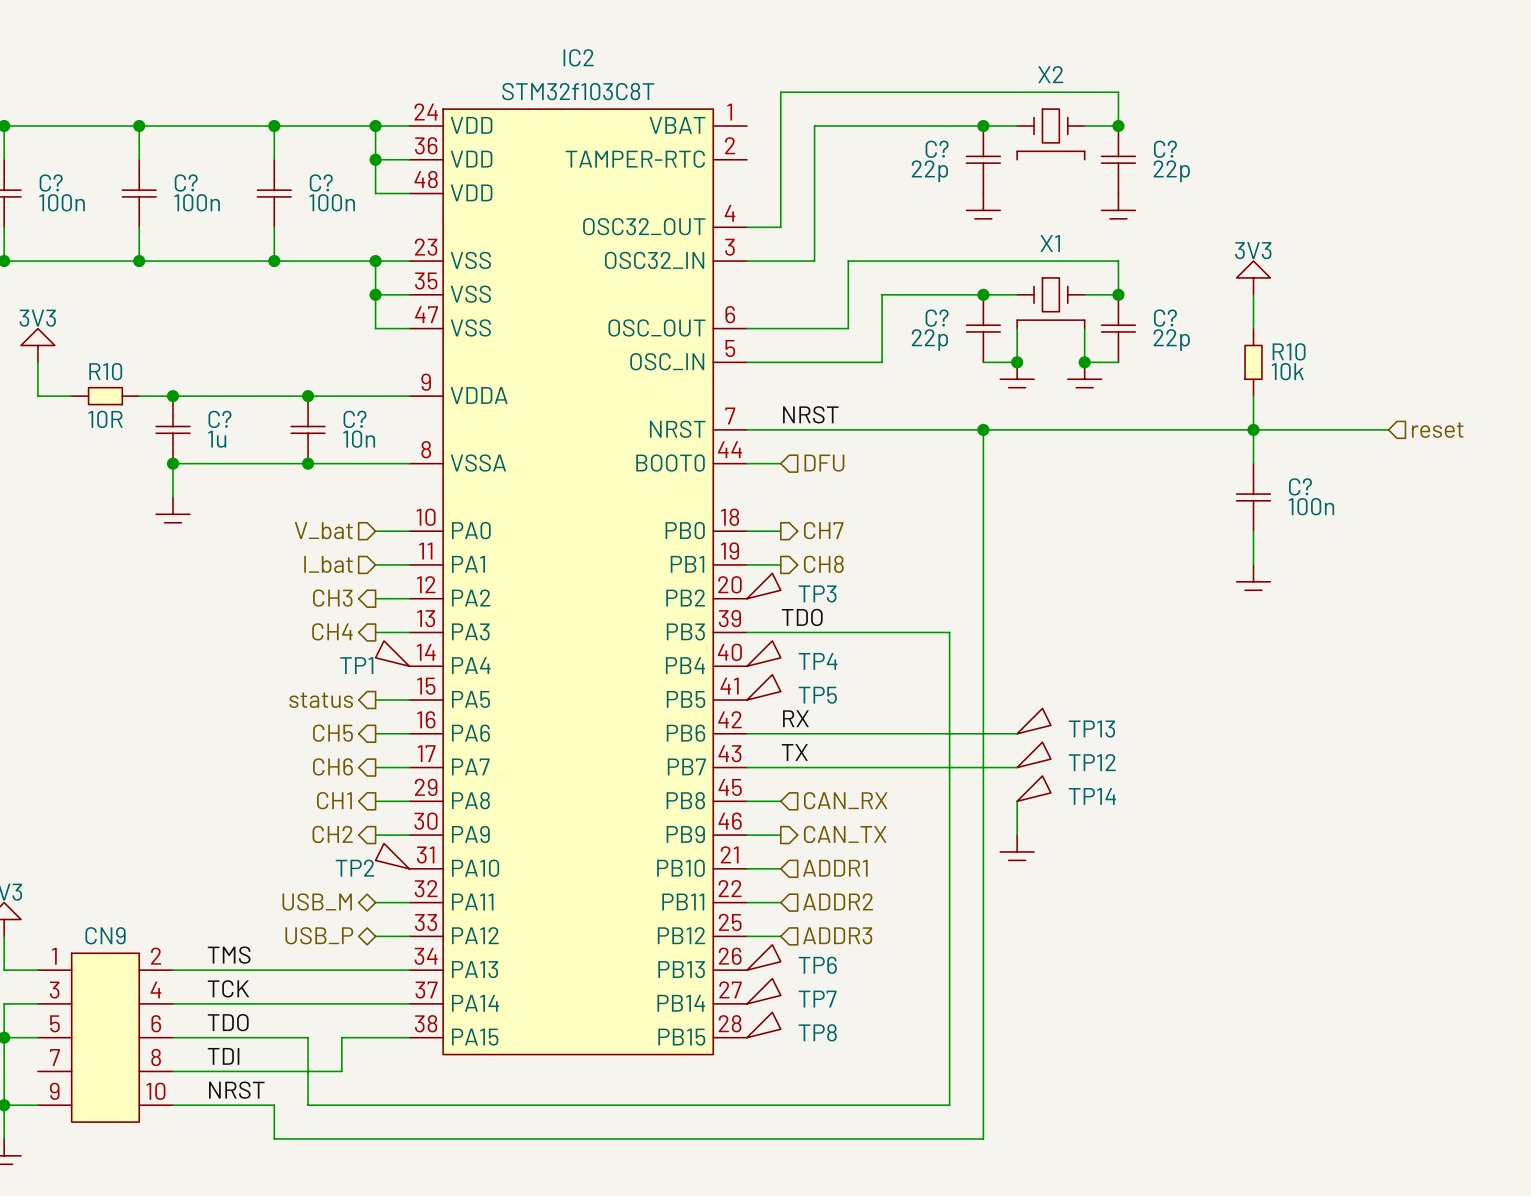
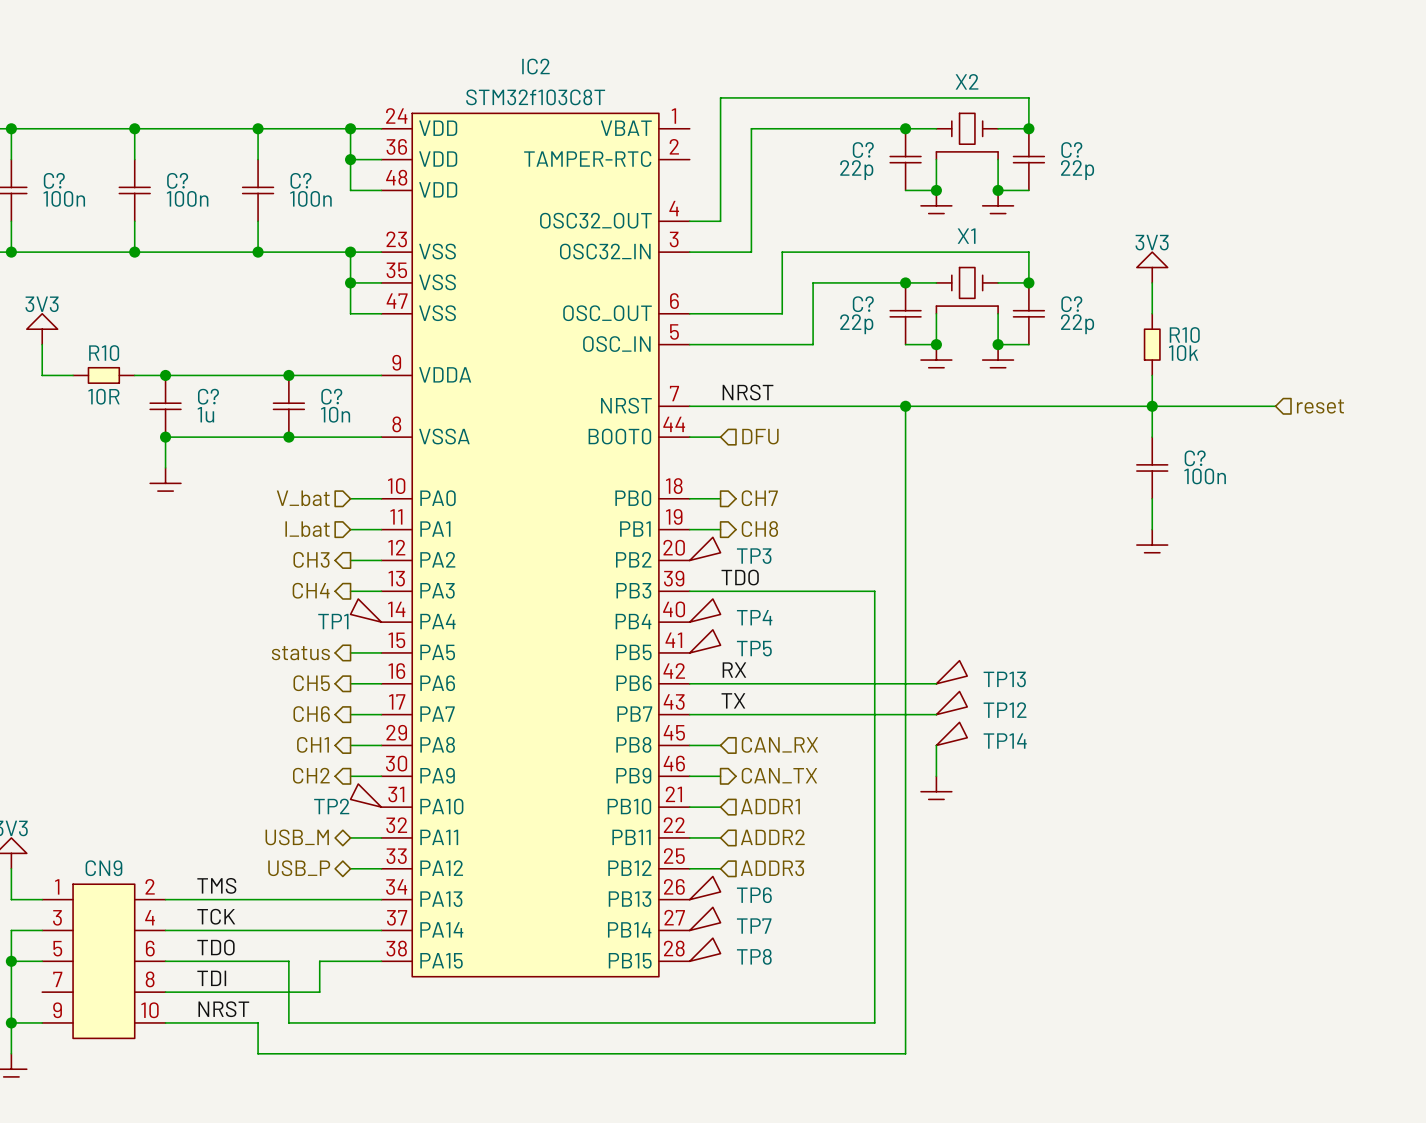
wire: none -> (936, 159) (936, 190) (905, 190)
wire: none -> (998, 159) (998, 190) (1028, 190)
junction: none -> (936, 190)
junction: none -> (998, 190)
power symbol position: (983, 210) -> (936, 205)
power symbol position: (1118, 210) -> (998, 205)

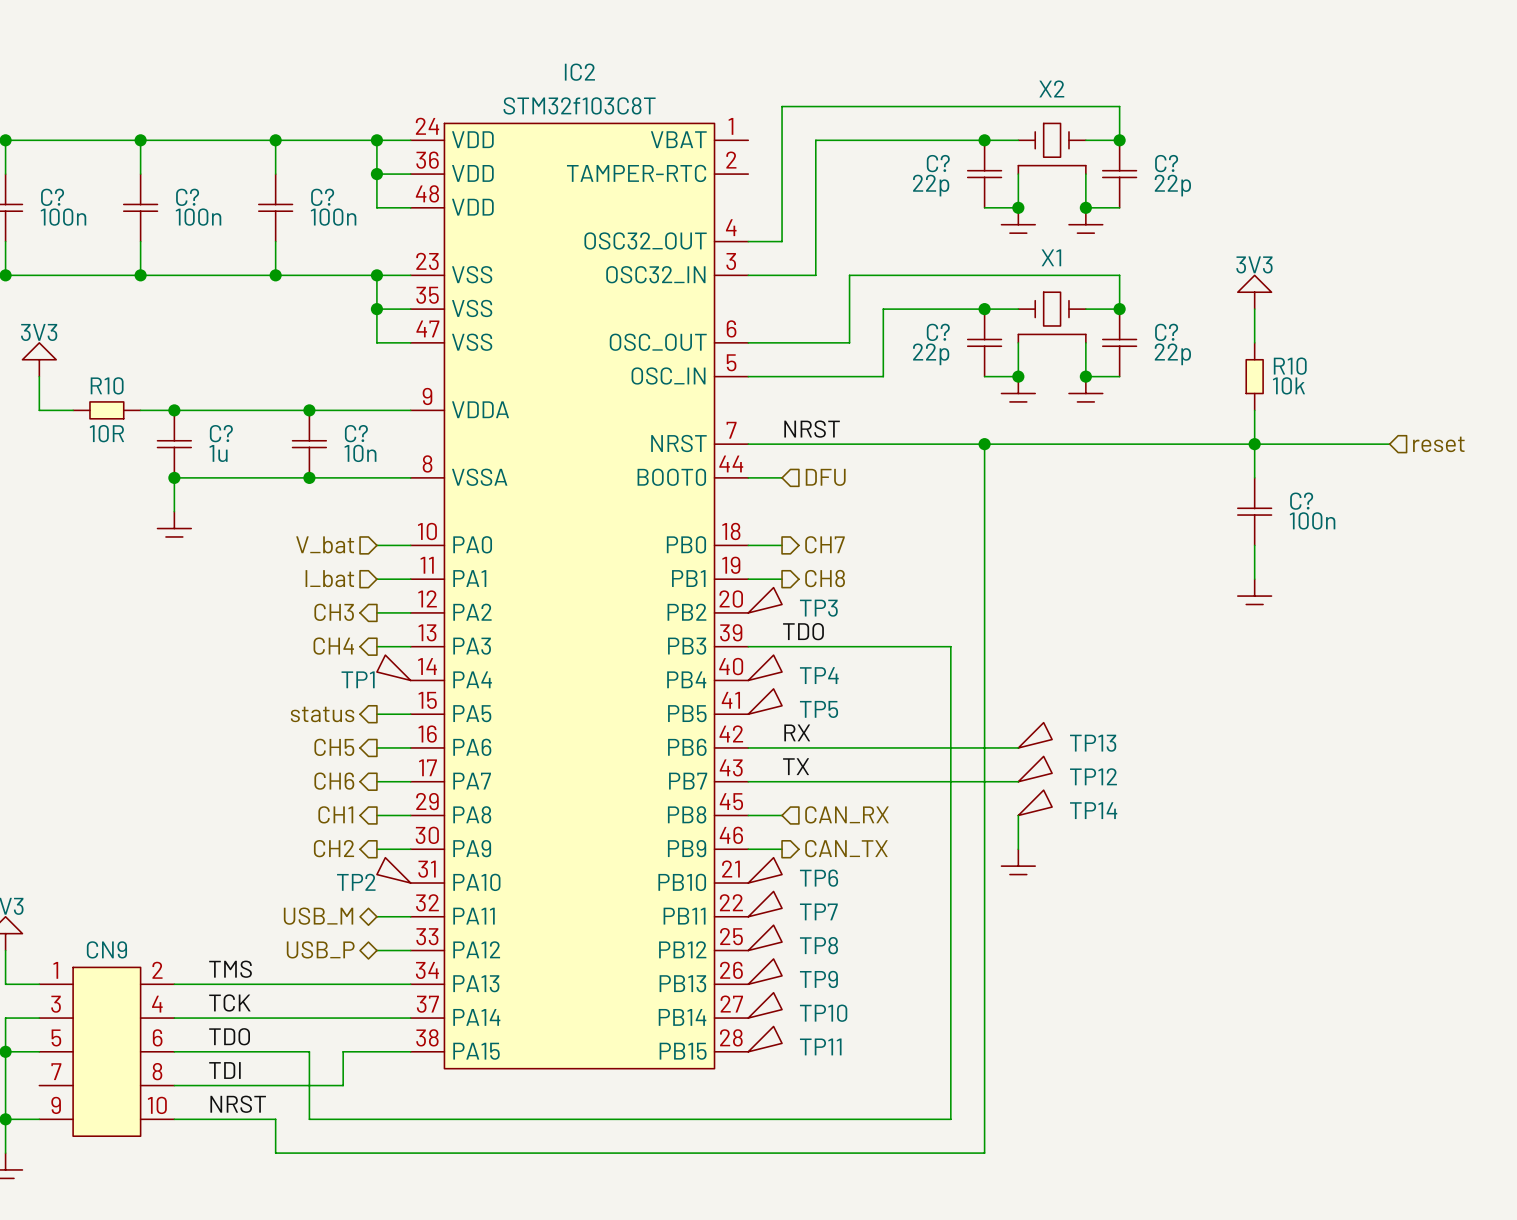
TP6: none -> (765, 870)
hierarchical label: ADDR1 (770, 806) -> none
wire: (689, 807) (720, 807) -> none
TP7: none -> (765, 904)
wire: (689, 837) (720, 837) -> none
hierarchical label: ADDR2 (772, 837) -> none
TP8: none -> (765, 937)
wire: (689, 868) (720, 868) -> none
hierarchical label: ADDR3 (772, 868) -> none
TP6 name: TP6 (754, 895) -> TP9 (818, 979)
TP7 name: TP7 (754, 926) -> TP10 (823, 1013)
TP8 name: TP8 (754, 956) -> TP11 (820, 1046)

